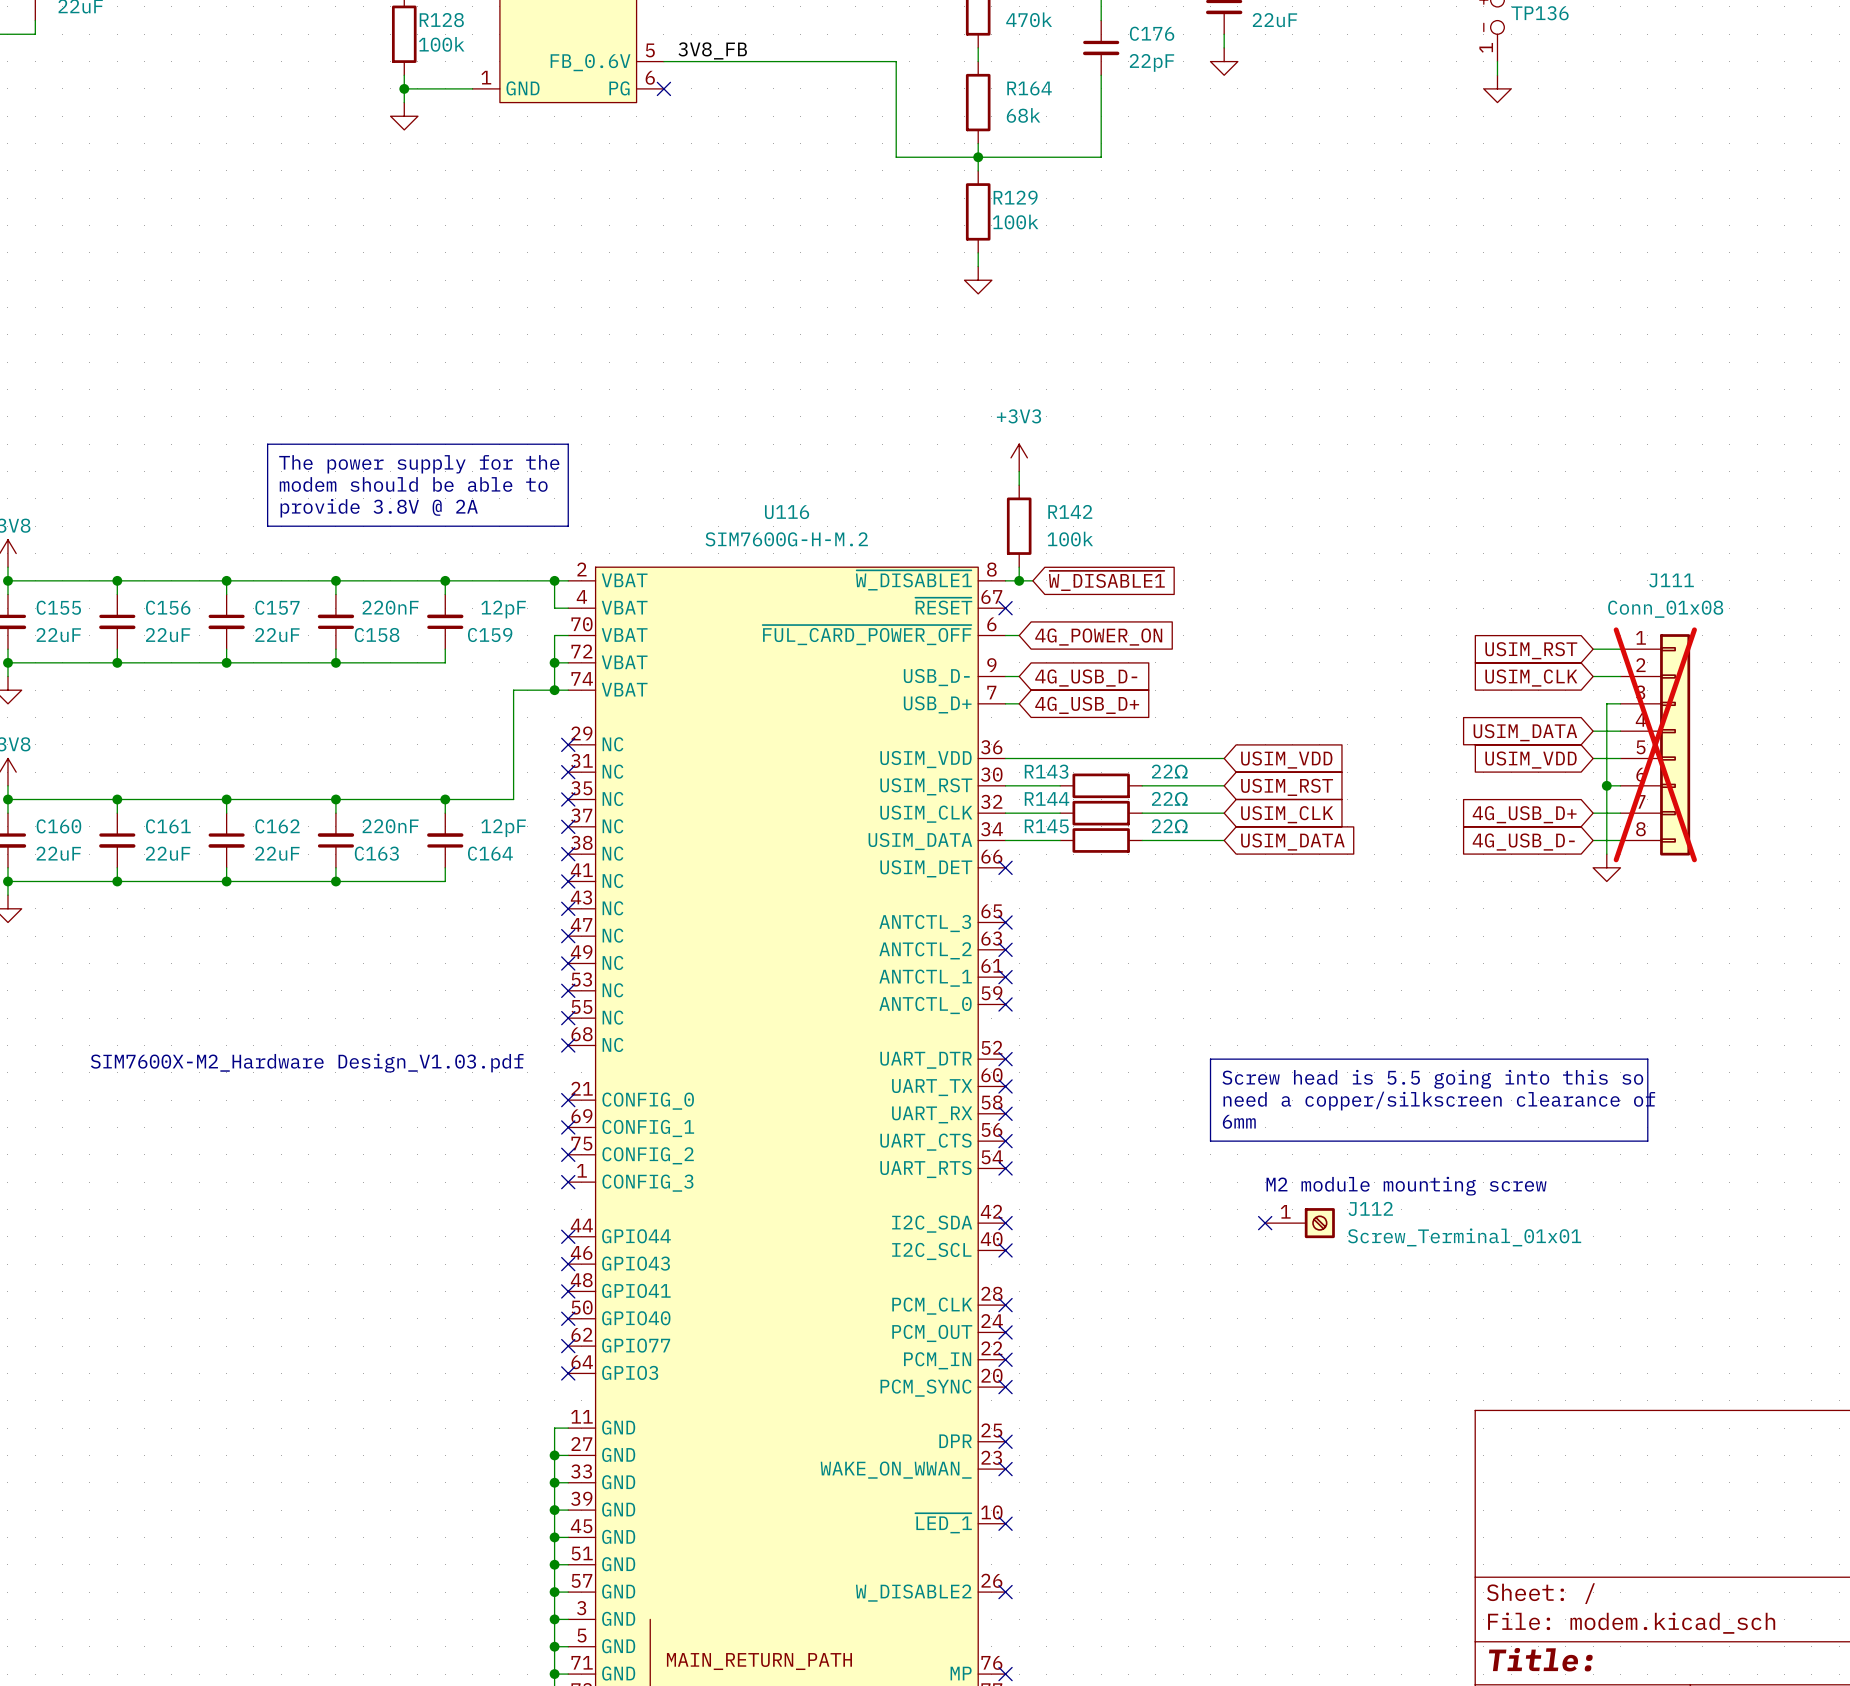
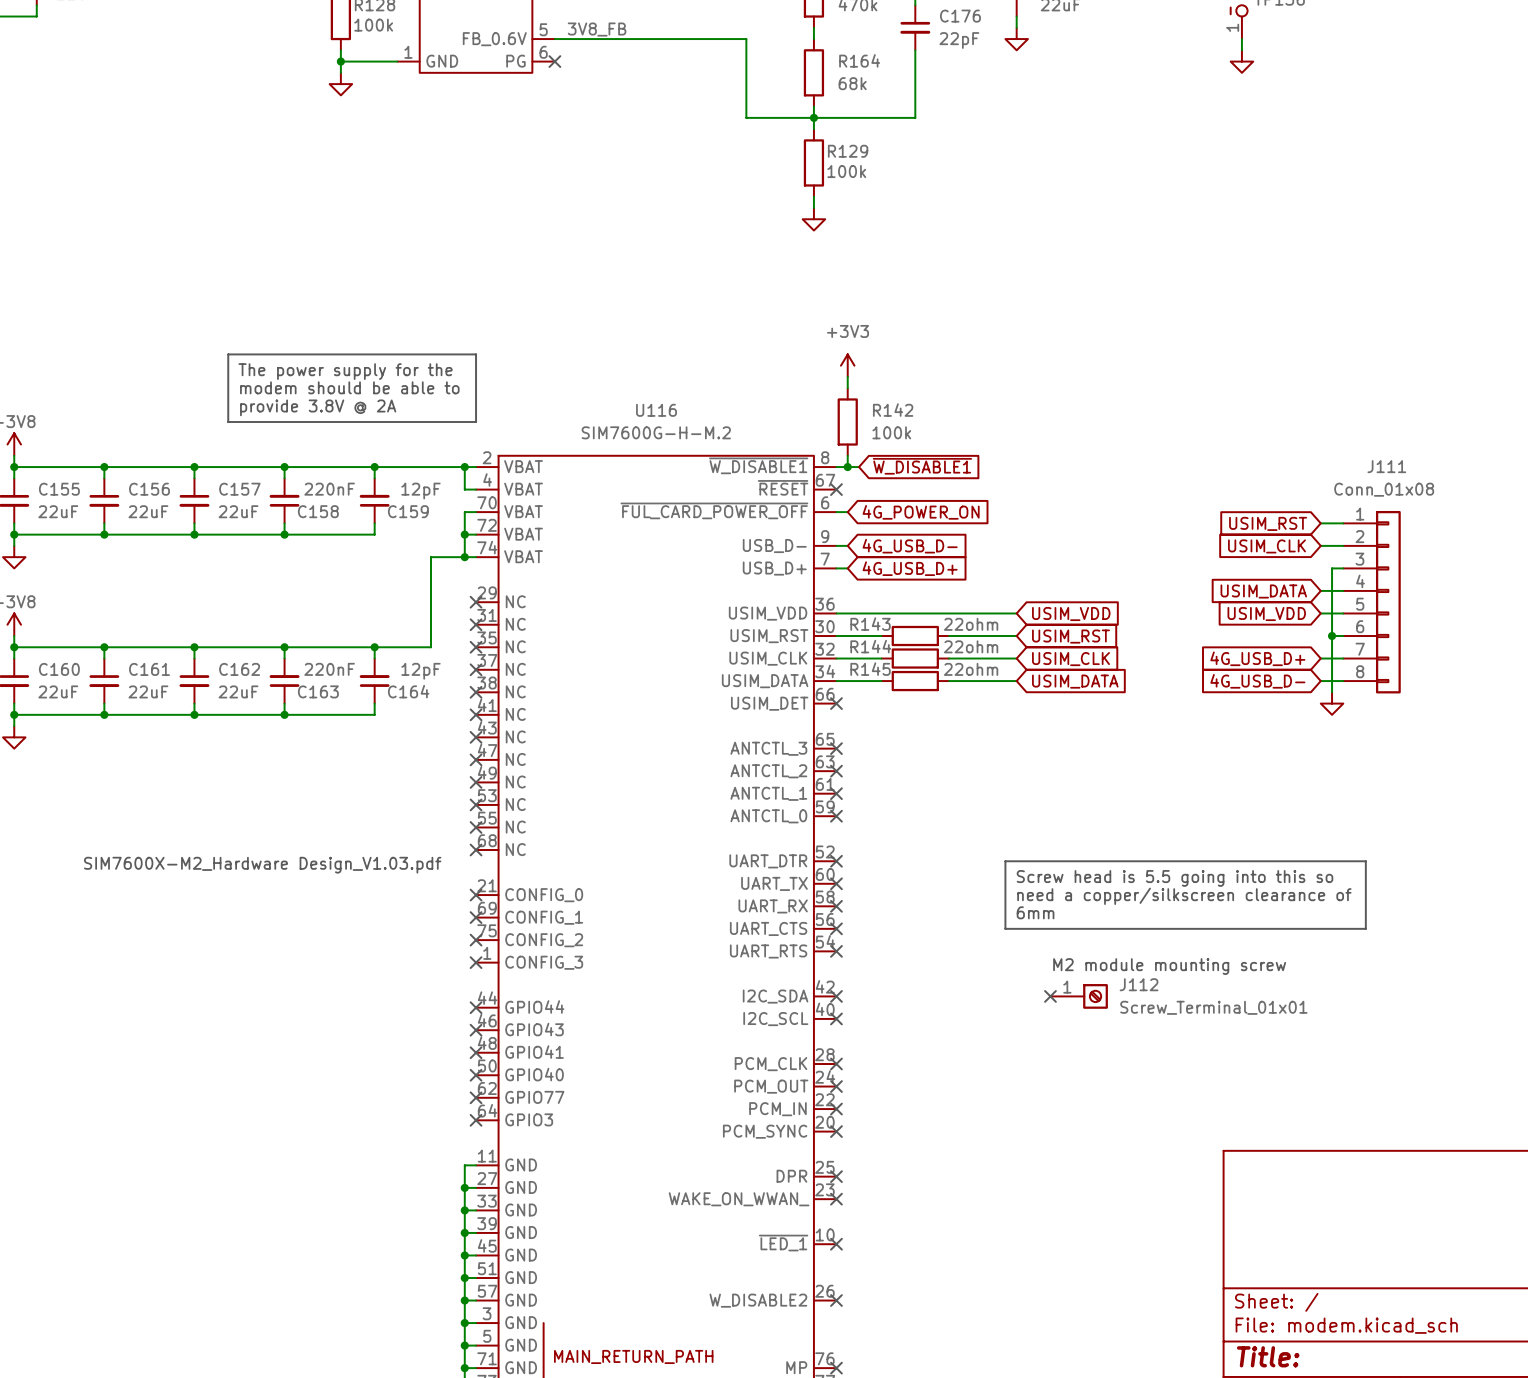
J111 do-not-place cross: (1655, 744) -> none
R143 value: 22Ω (1169, 771) -> 22ohm (971, 624)
R144 value: 22Ω (1169, 798) -> 22ohm (971, 646)
R145 value: 22Ω (1169, 826) -> 22ohm (971, 669)

